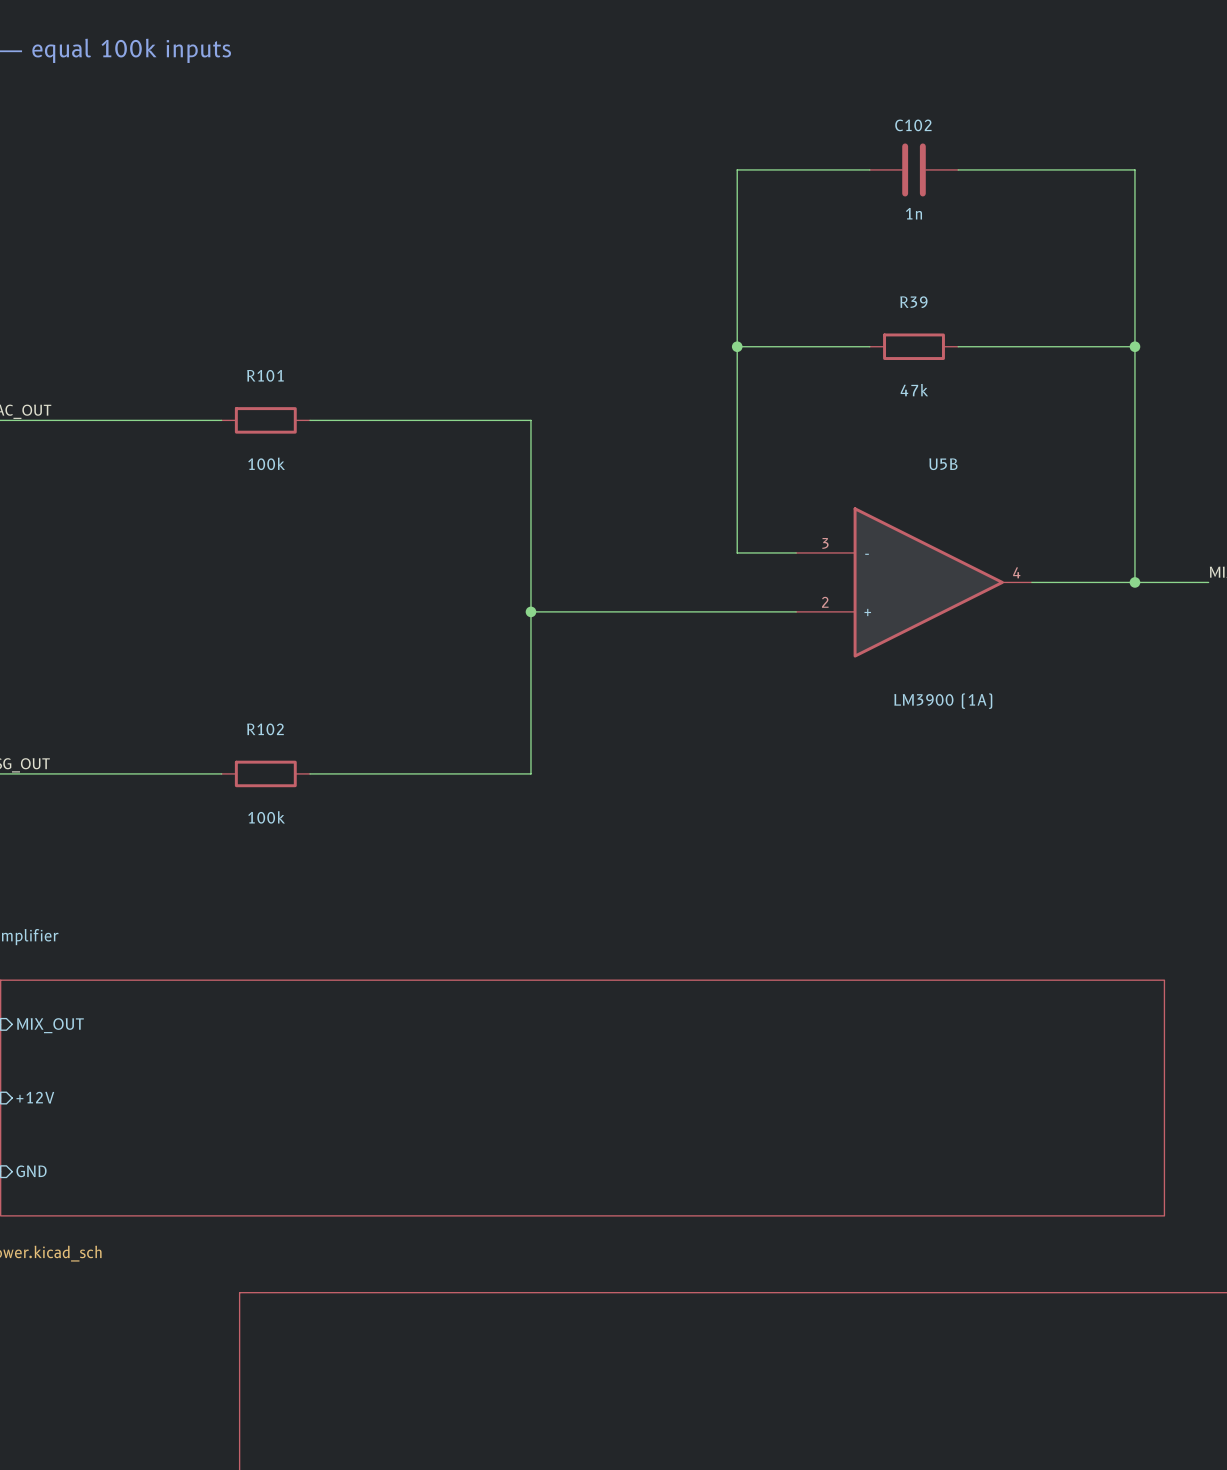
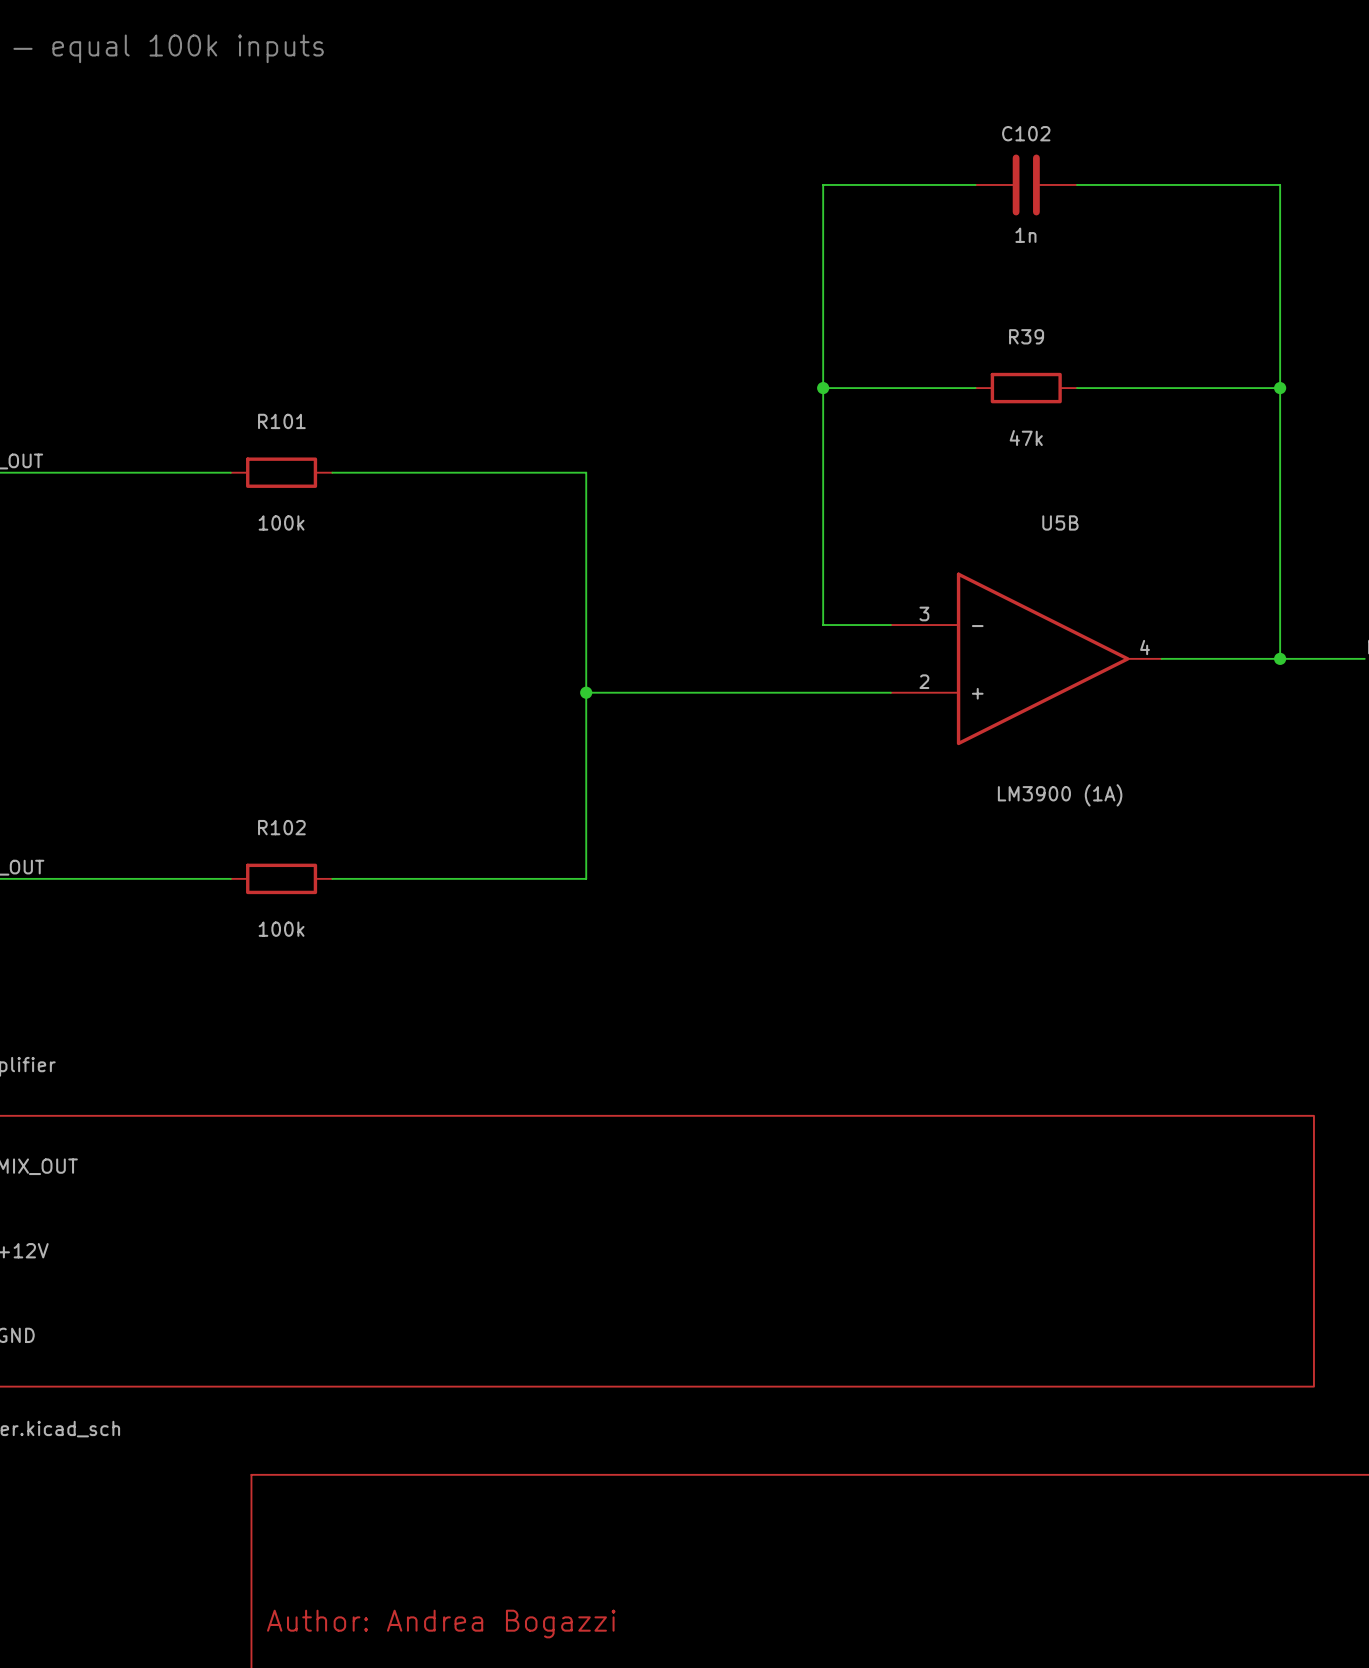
title block: none -> Author: Andrea Bogazzi (441, 1624)

